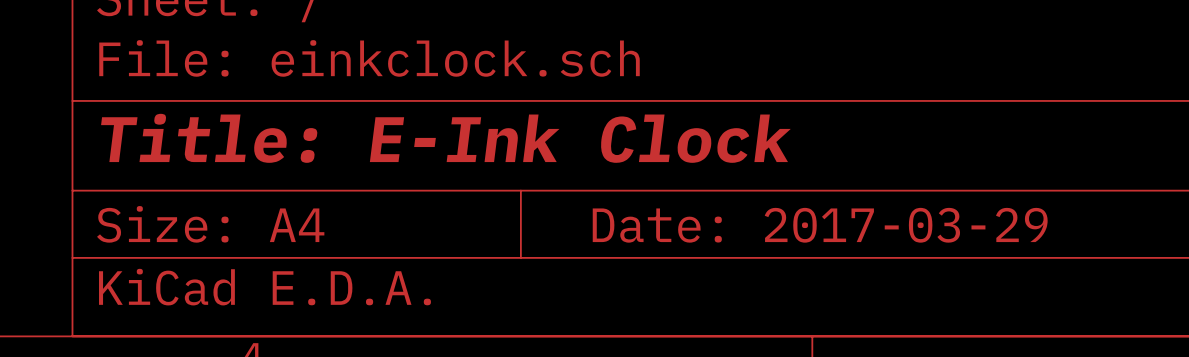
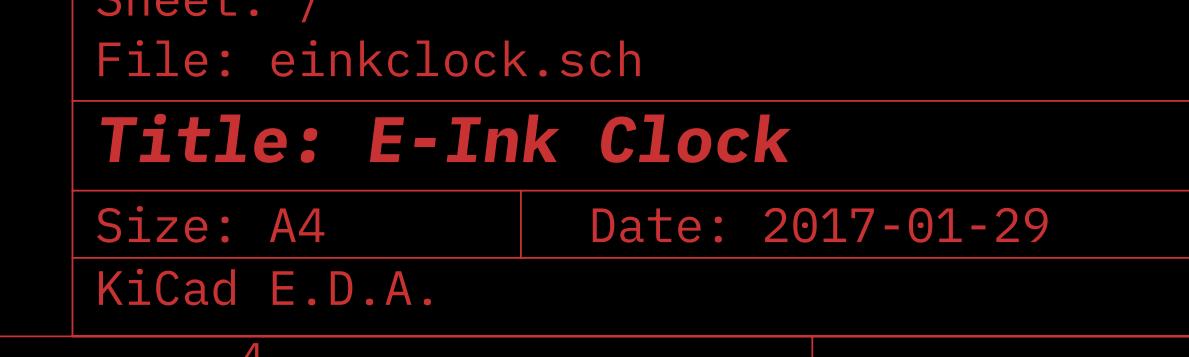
title block: Date: 2017-03-29 (820, 225) -> Date: 2017-01-29 (820, 225)

